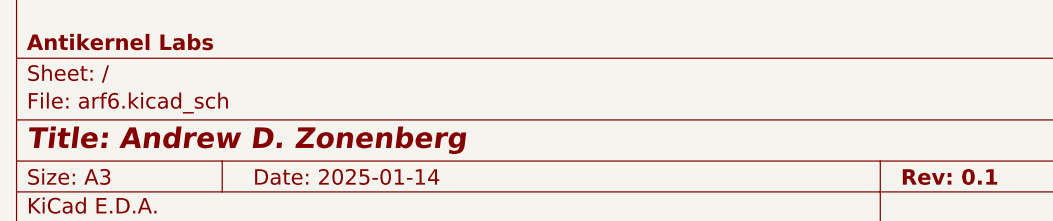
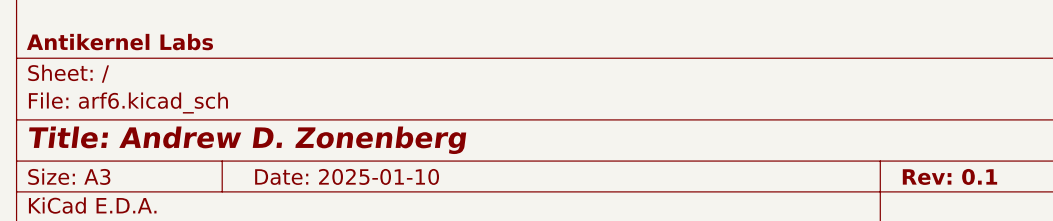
title block: Date: 2025-01-14 (347, 176) -> Date: 2025-01-10 (347, 176)

